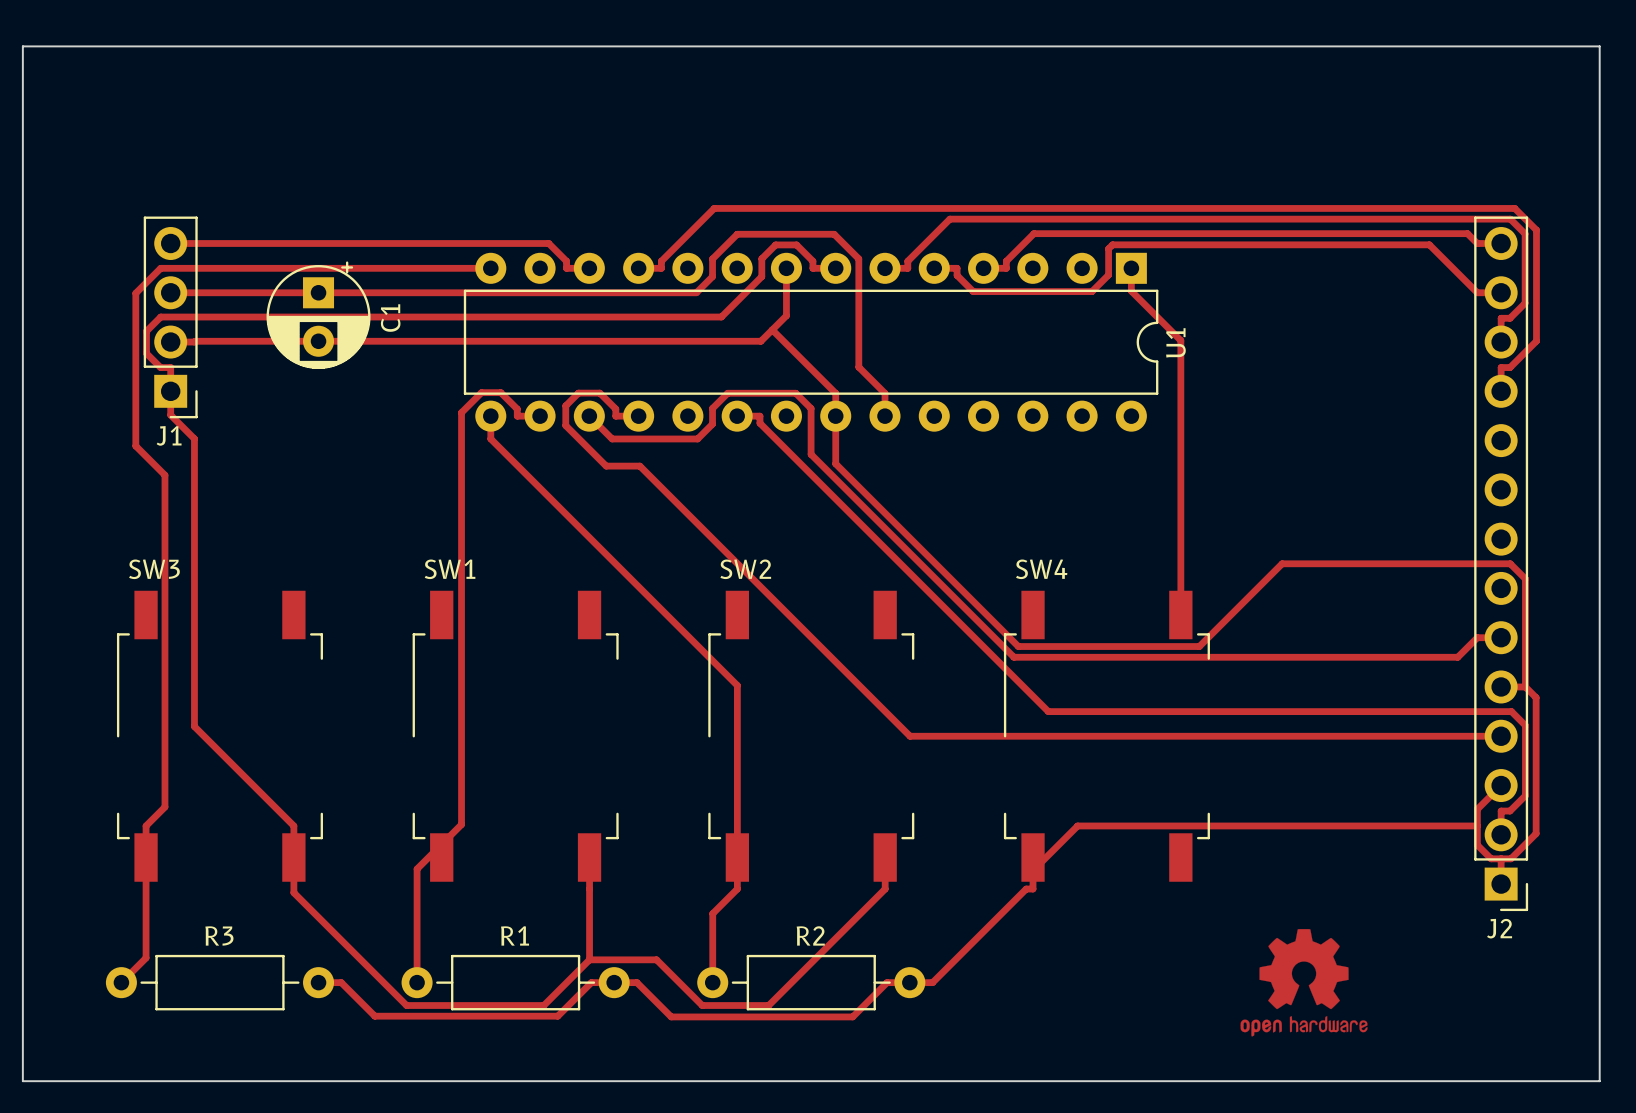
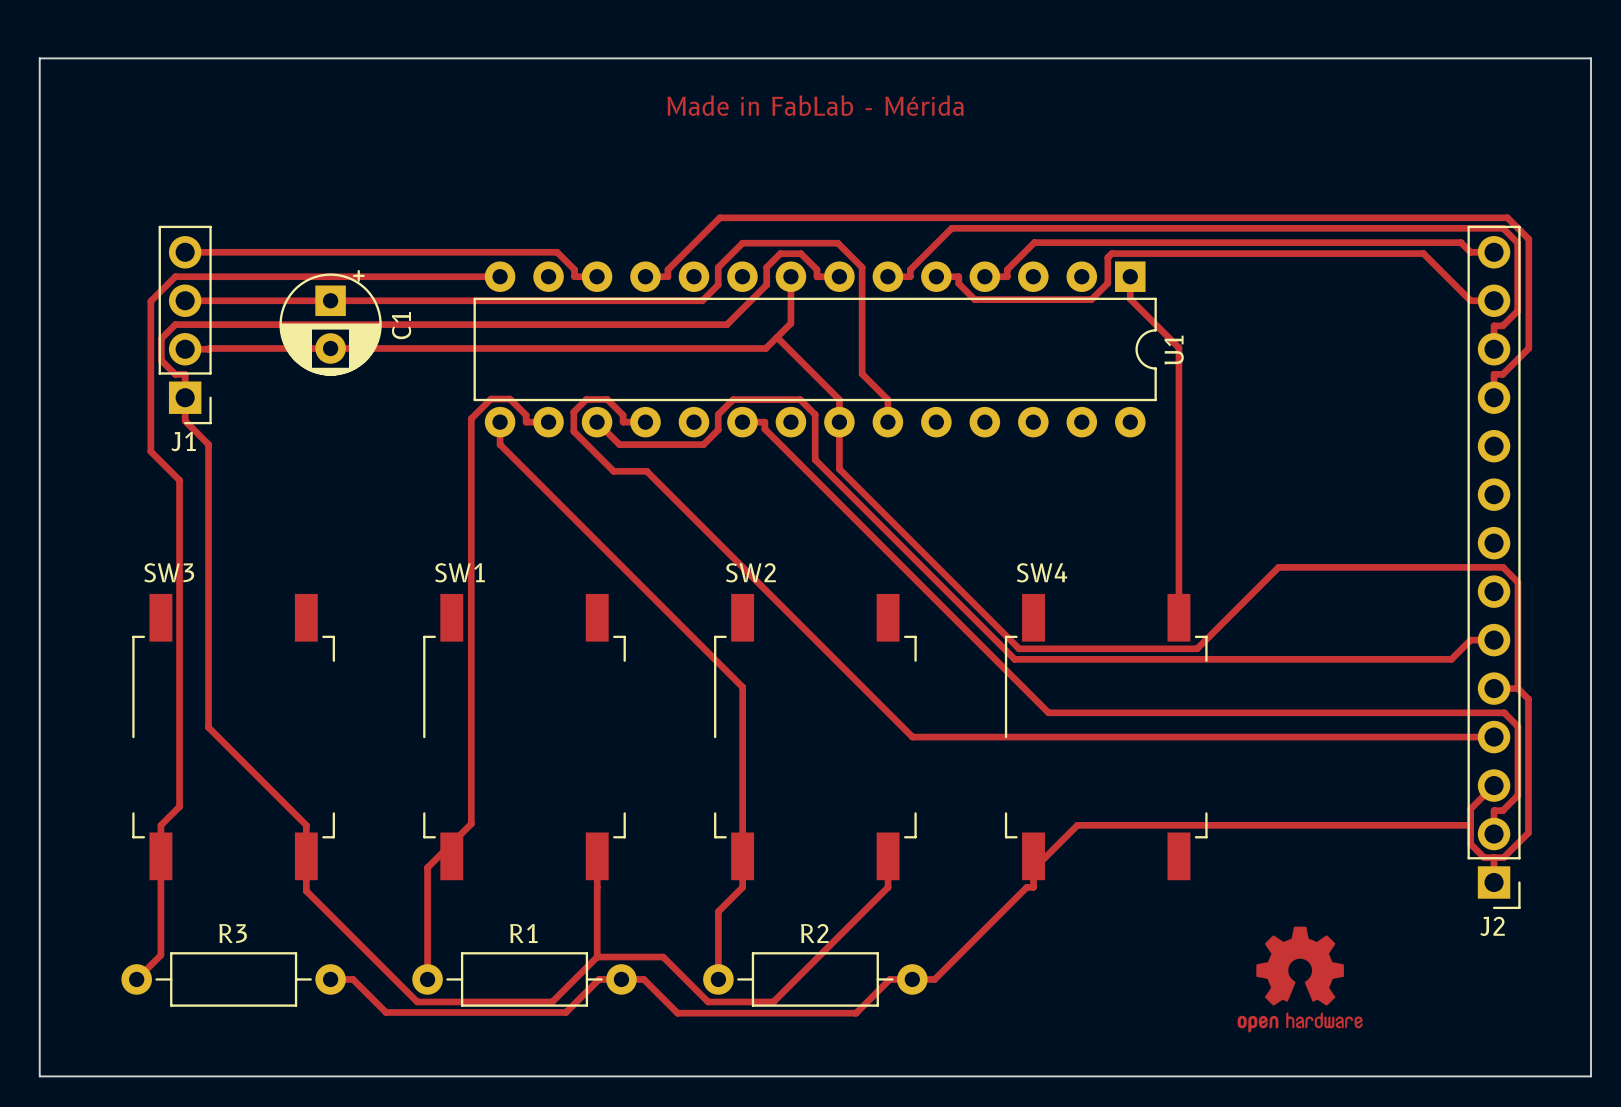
text: none -> Made in FabLab - Mérida (815, 105)

